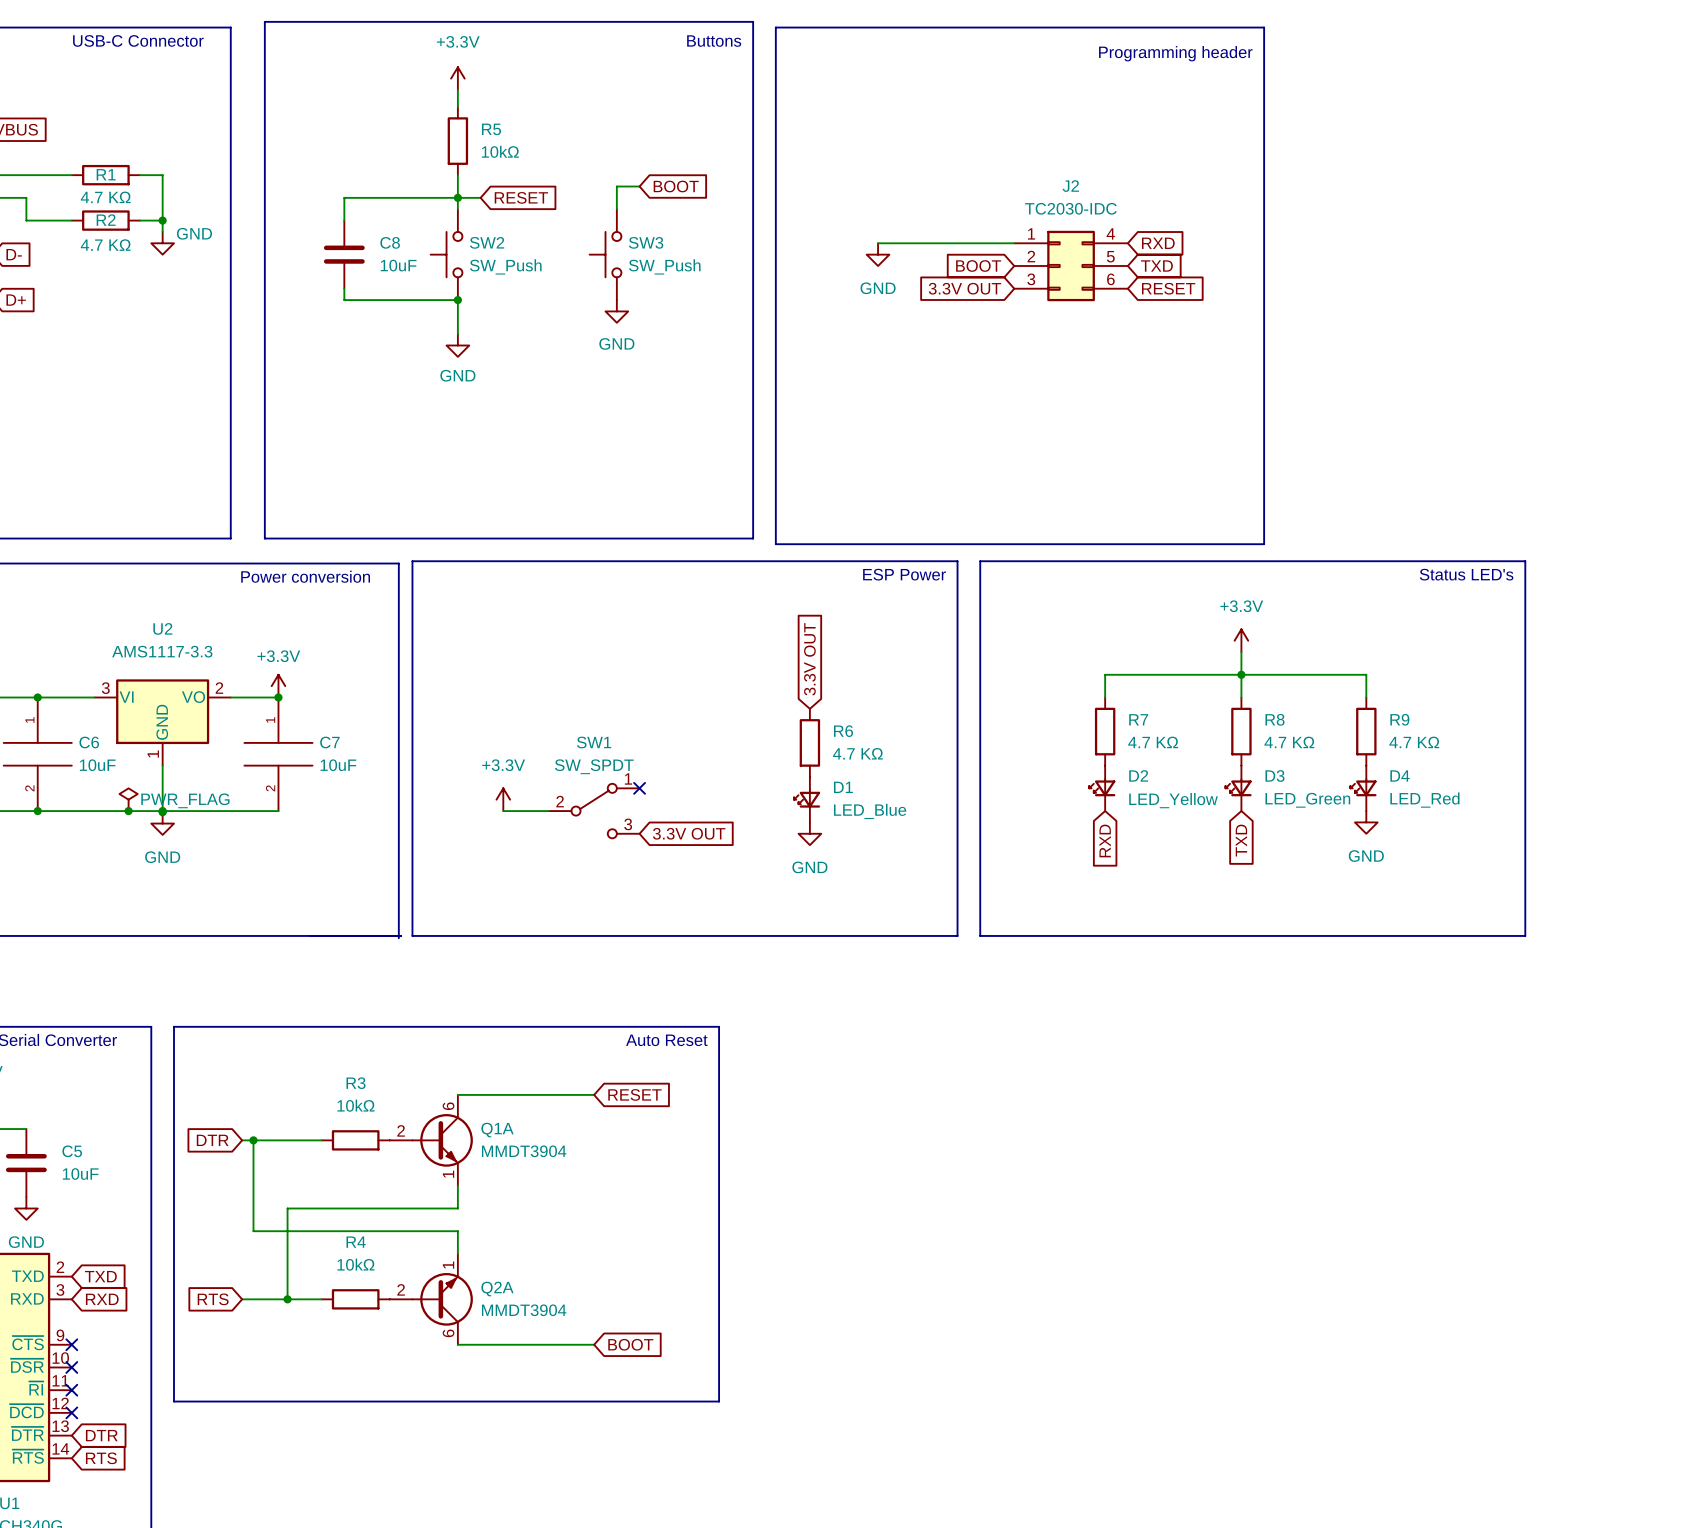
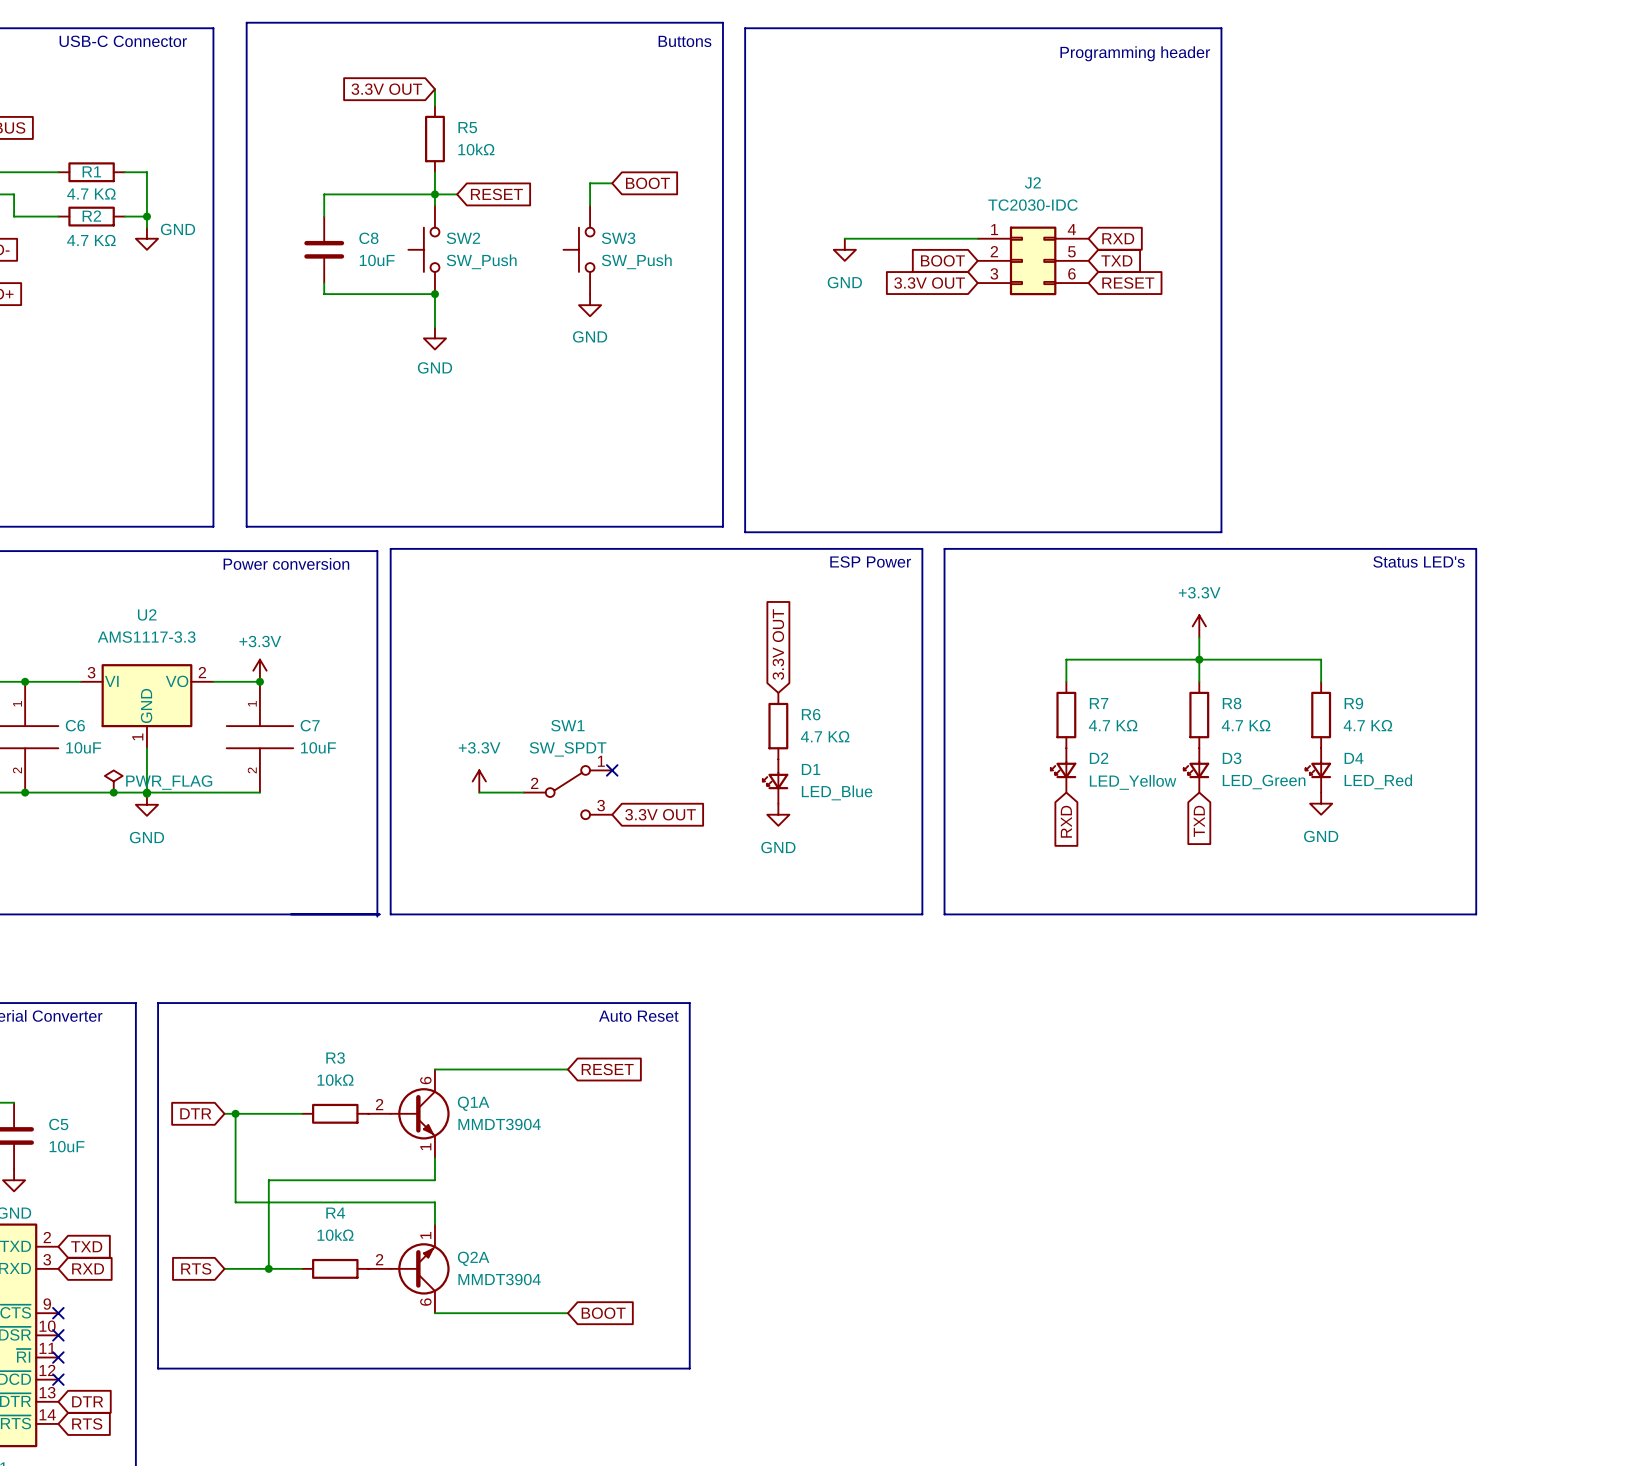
power symbol: +3.3V (457, 78) -> none
global label: none -> 3.3V OUT (386, 89)

